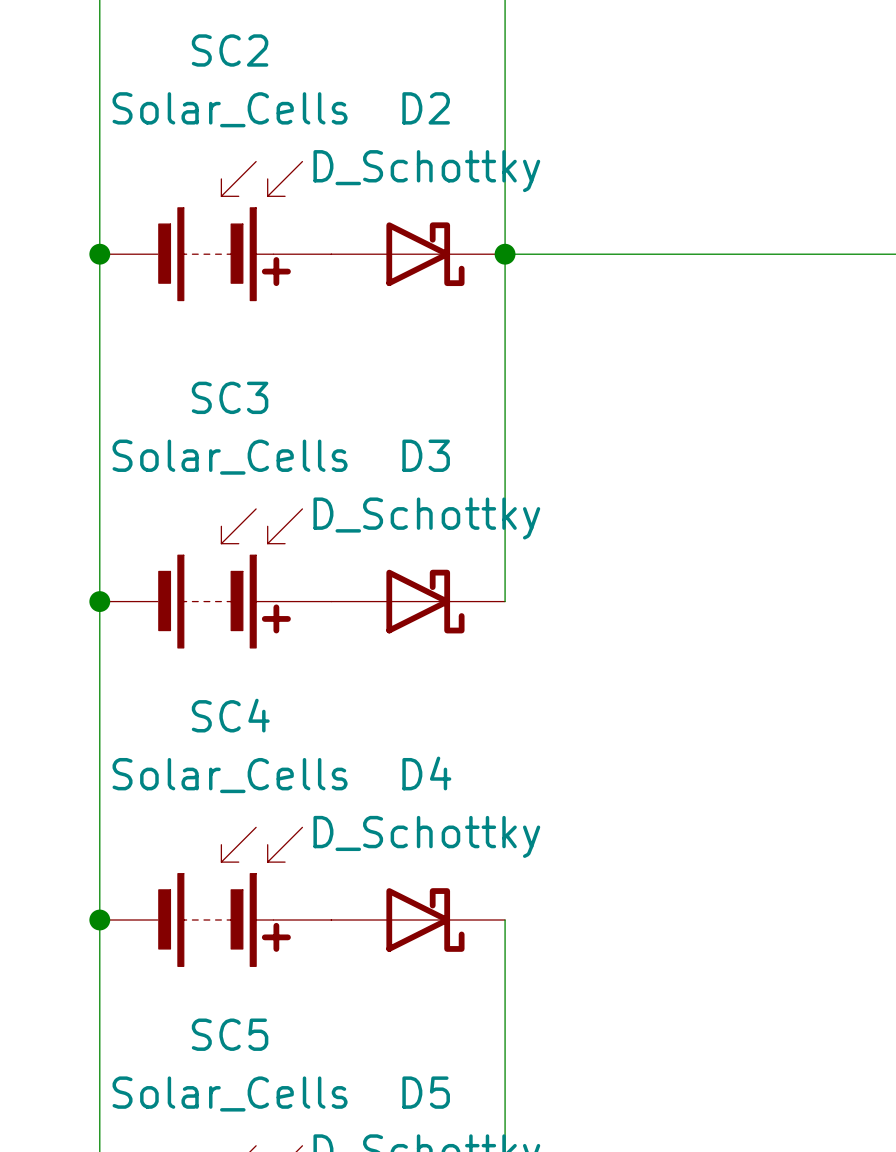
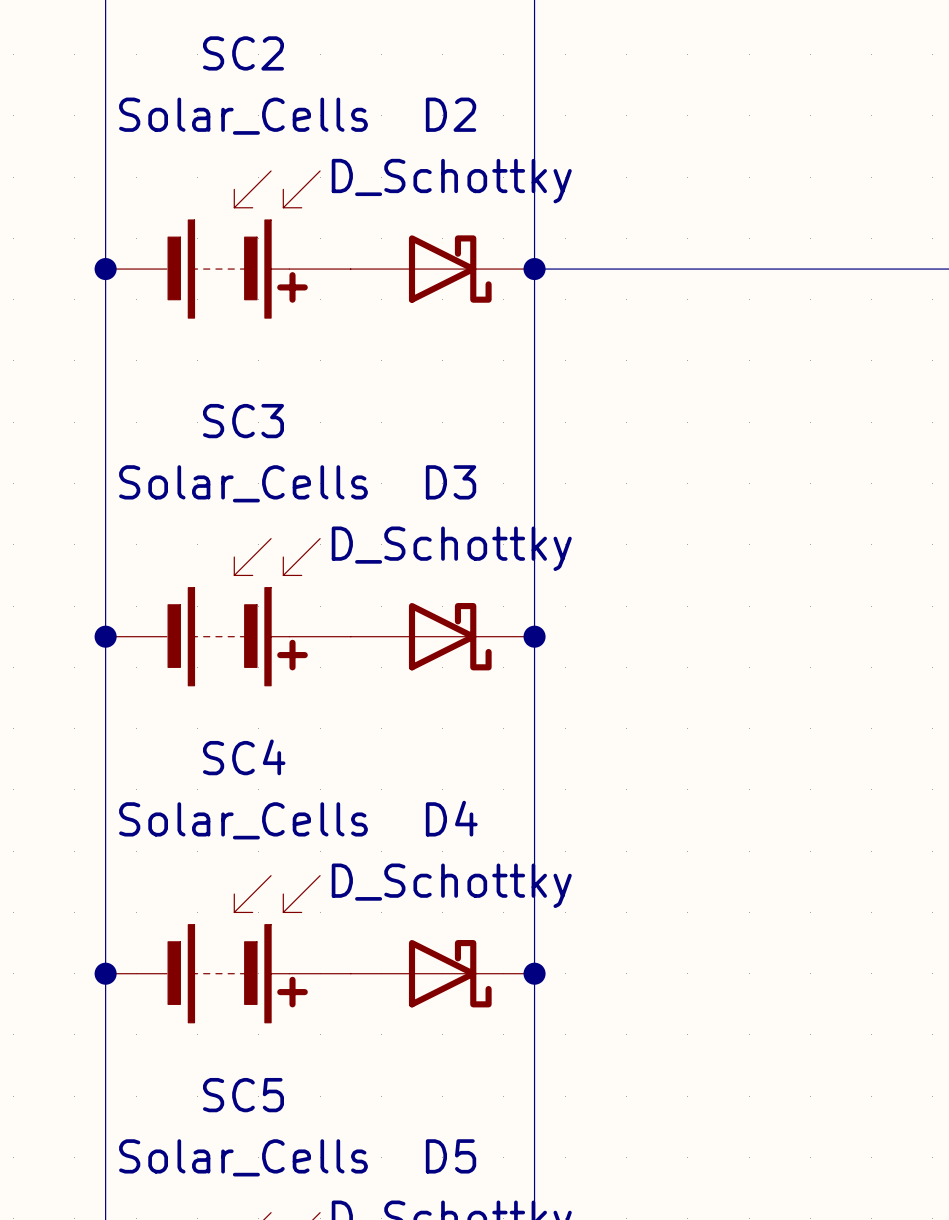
wire: none -> (534, 636) (534, 973)
junction: none -> (534, 636)
junction: none -> (534, 973)

